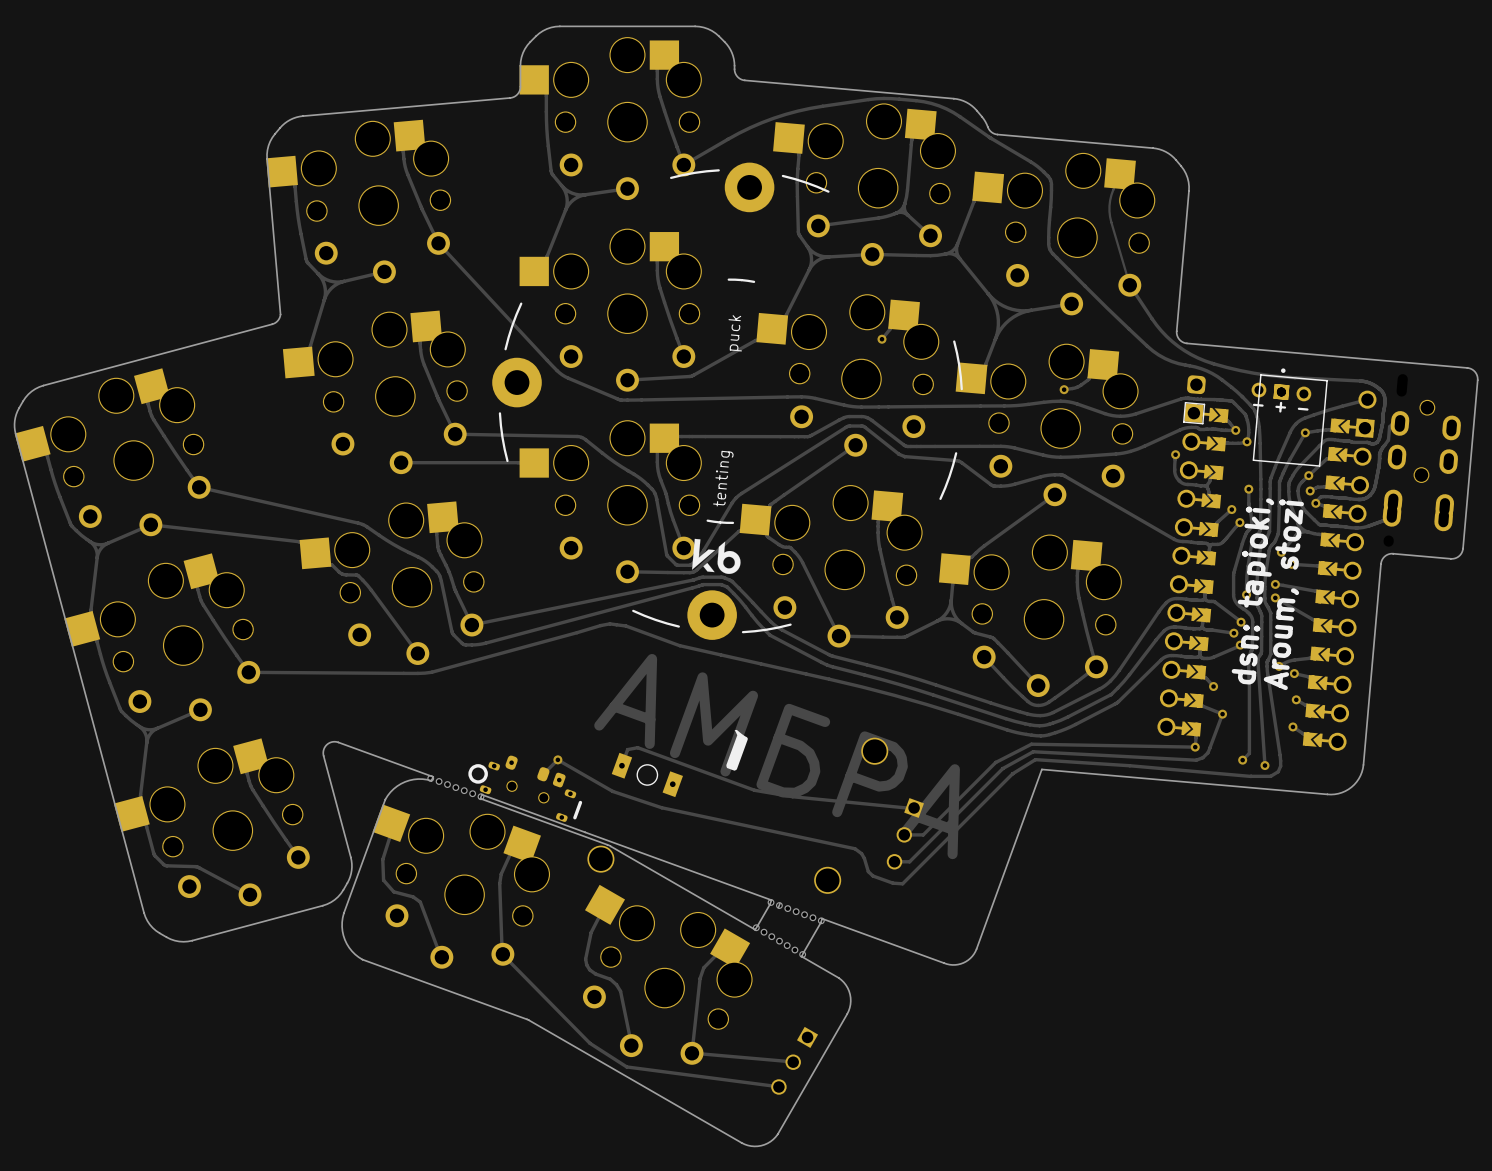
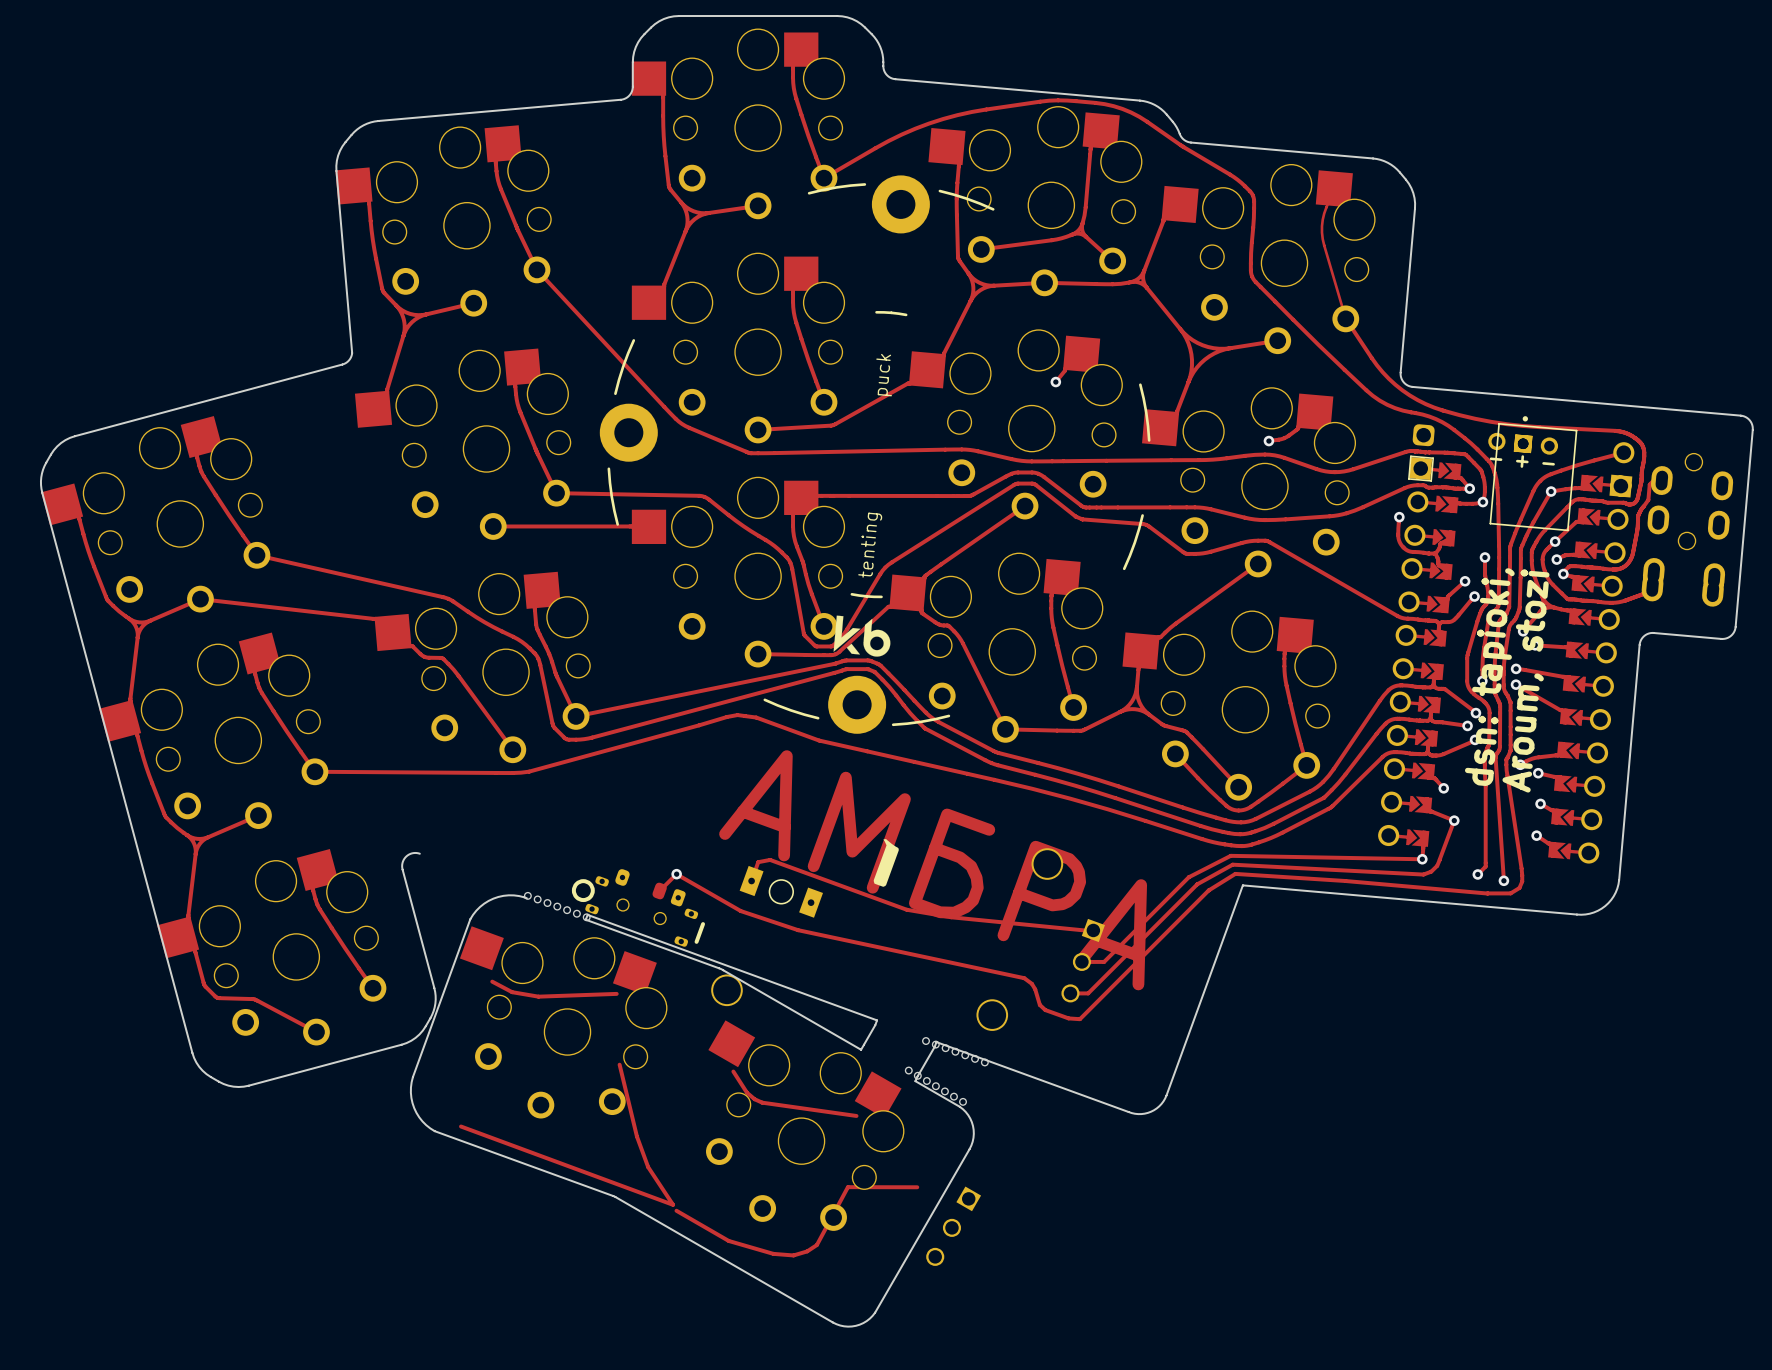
board edge: (338, 742) (433, 776) (431, 780) (418, 779) (405, 781) (393, 788) (385, 799) (342, 917) (342, 926) (344, 939) (355, 954) (362, 959) (528, 1019) (744, 1144) (761, 1145) (775, 1137) (849, 1007) (850, 994) (843, 982) (801, 956) (822, 918) (944, 963) -> (936, 1042) (1128, 1112)
board edge: none -> (526, 898) (508, 895) (493, 898) (480, 906) (470, 919) (412, 1077) (411, 1097) (419, 1117) (434, 1131) (614, 1196) (836, 1324) (855, 1325) (866, 1321) (875, 1312) (971, 1145) (973, 1129) (965, 1111) (915, 1081) (934, 1047)
board edge: (481, 794) (480, 798) (609, 845) (755, 929) (769, 904) (771, 900) (585, 832) -> (587, 914) (585, 919) (721, 969) (861, 1049) (875, 1025) (877, 1020) (708, 958)
track: (392, 828) (382, 859) (383, 880) (393, 891) (413, 896) (420, 902) (440, 956) -> none
track: (512, 849) (501, 874) (499, 883) (502, 954) (589, 1043) (626, 1066) (778, 1086) -> none
track: none -> (492, 981) (512, 992) (538, 996) (616, 993)
track: (605, 904) (591, 932) (585, 959) (589, 969) (610, 979) (620, 991) (631, 1046) -> none
track: none -> (619, 1064) (636, 1136) (648, 1167) (673, 1204) (461, 1126)
track: none -> (733, 1071) (746, 1092) (762, 1102) (856, 1115)
track: (719, 951) (703, 967) (700, 978) (691, 1053) (792, 1061) -> none
track: none -> (917, 1187) (847, 1187) (816, 1245) (807, 1251) (793, 1255) (773, 1253) (728, 1240) (676, 1210)

